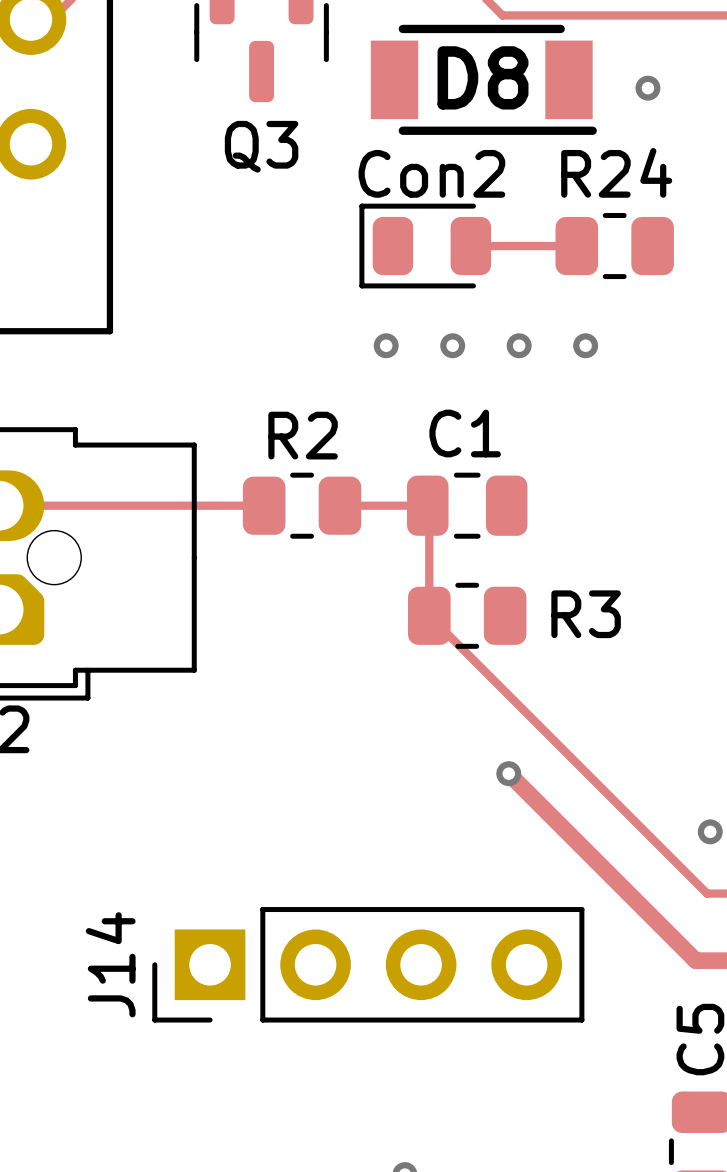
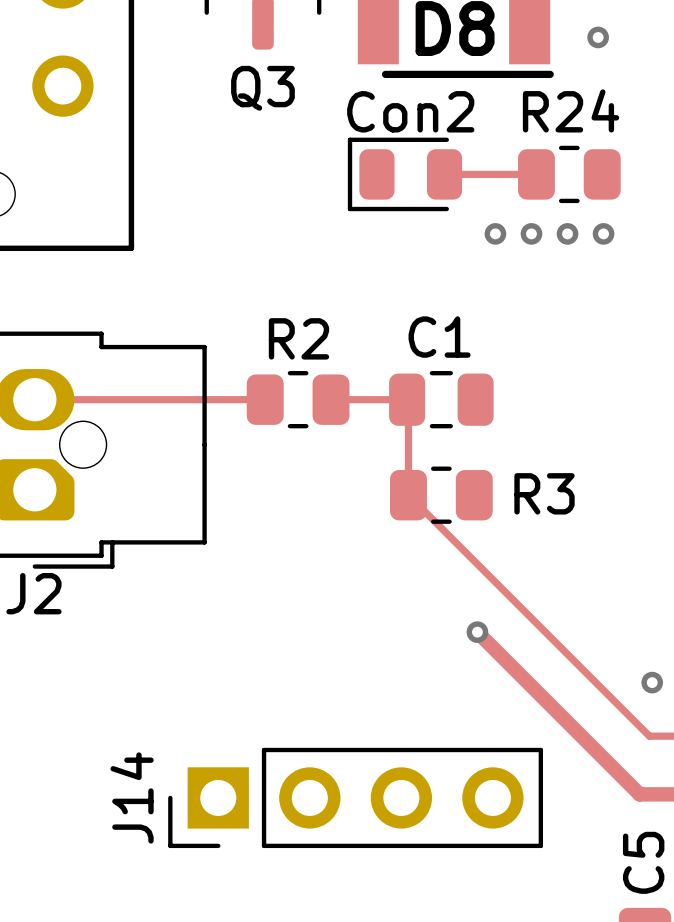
via: none -> (495, 233)
via: none -> (531, 233)
via: none -> (567, 233)
via: none -> (603, 233)
via: (386, 345) -> none
via: (452, 345) -> none
via: (519, 345) -> none
via: (585, 345) -> none

